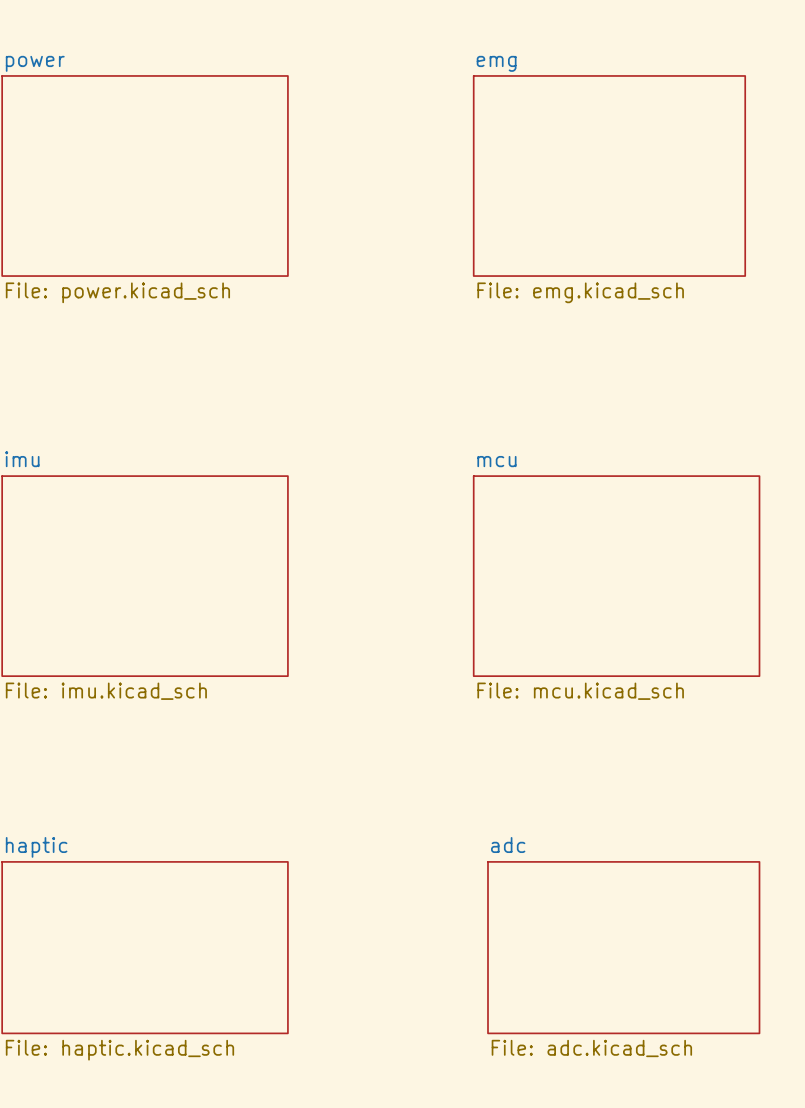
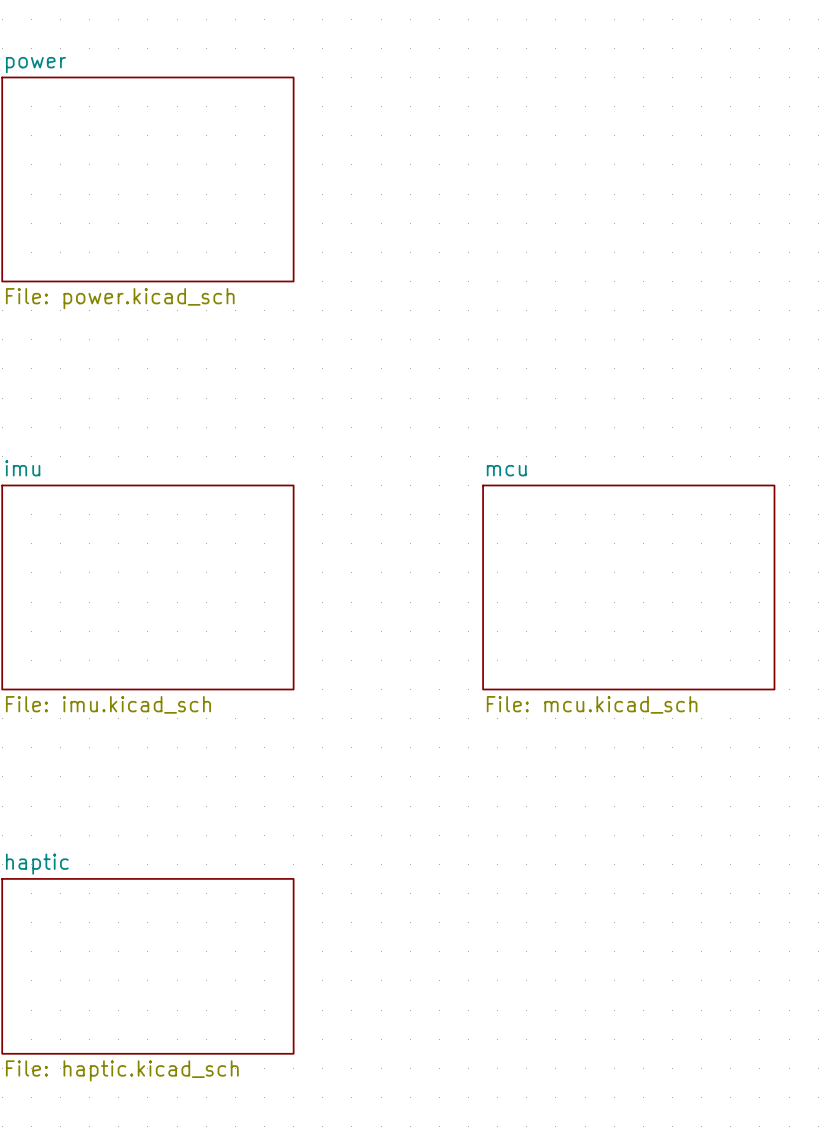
sheet emg: File: emg.kicad_sch (609, 176) -> none
sheet adc: File: adc.kicad_sch (623, 947) -> none

